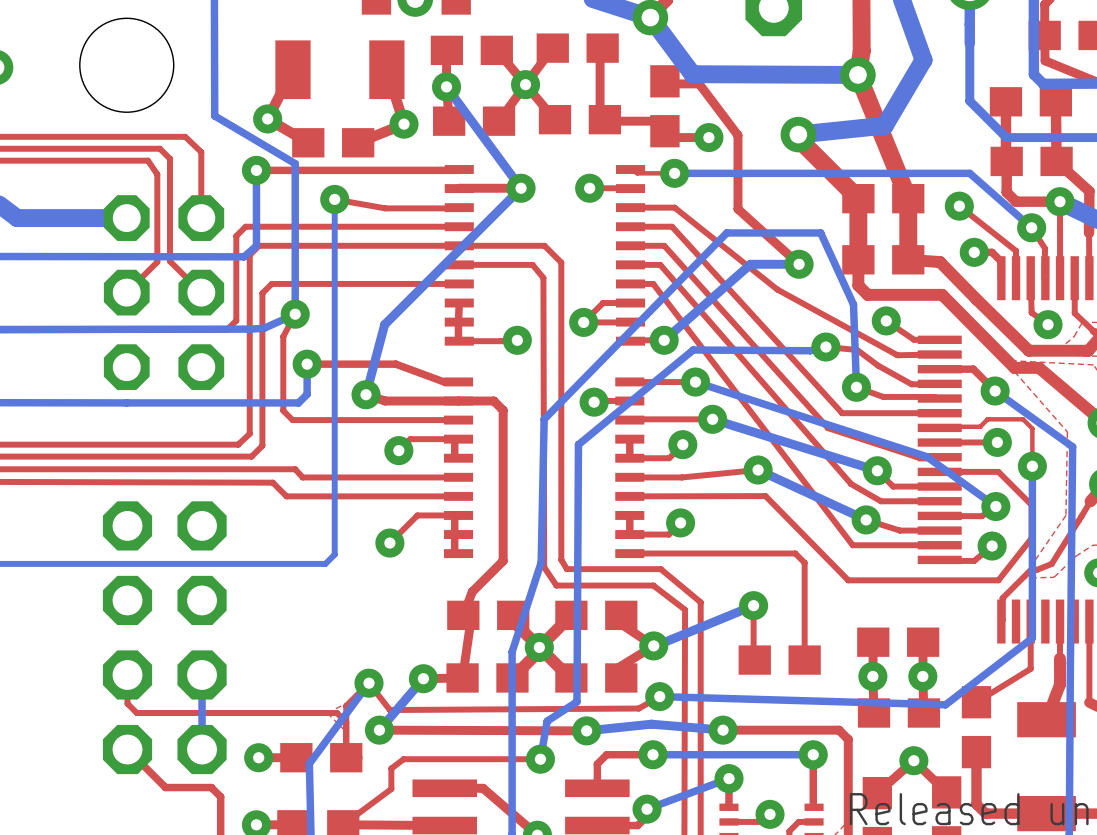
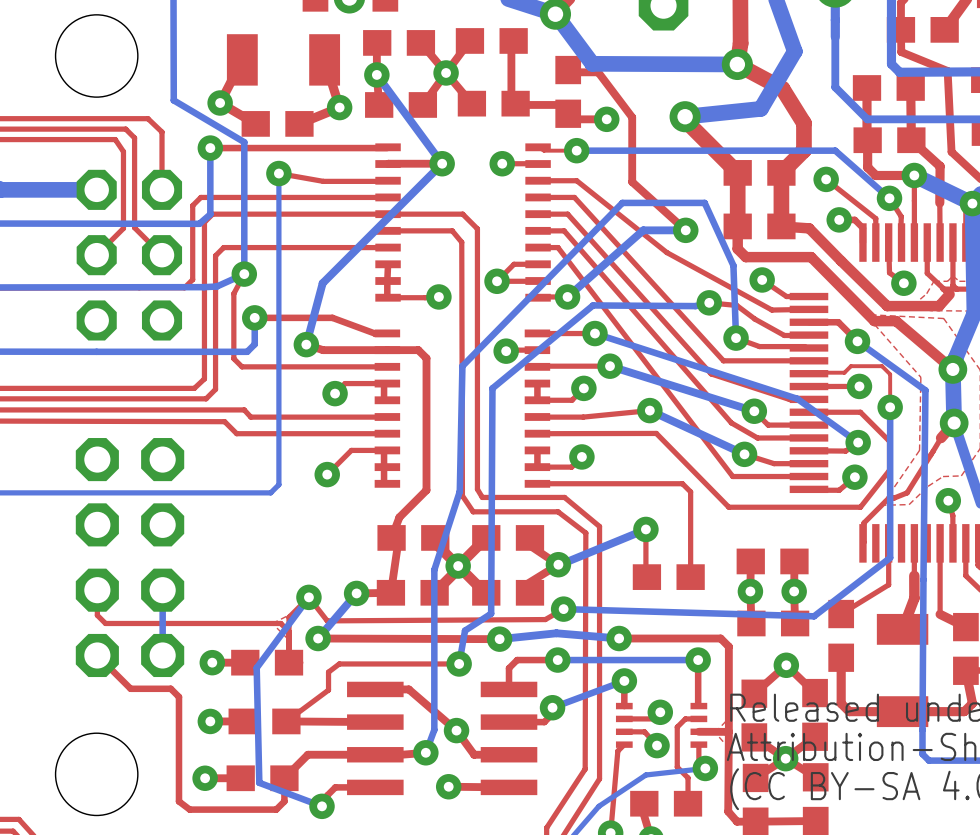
top track: (857, 74) (908, 198) -> (737, 64) (782, 88) (803, 123) (803, 150) (781, 172)

